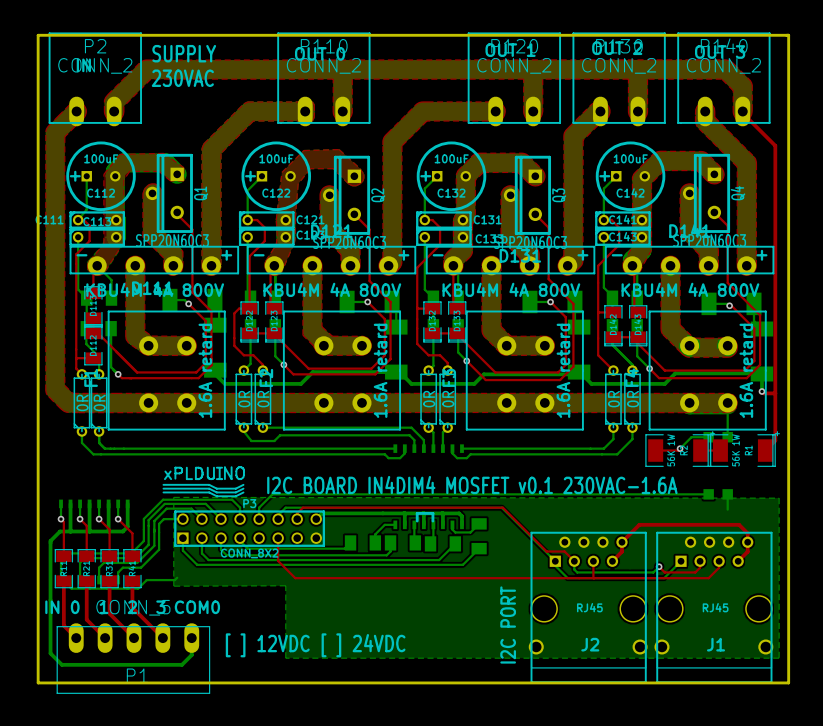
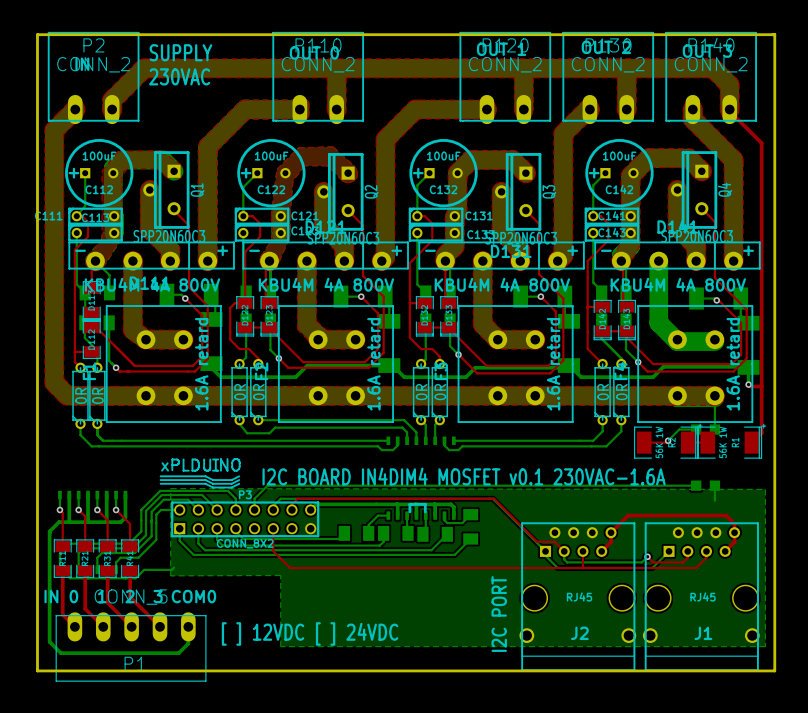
top zone outline: (669, 256) (664, 258) (661, 264) (662, 334) (682, 354) (688, 357) (728, 357) (733, 355) (737, 345) (732, 338) (693, 337) (680, 324) (680, 264) (675, 257) (669, 256) -> none

